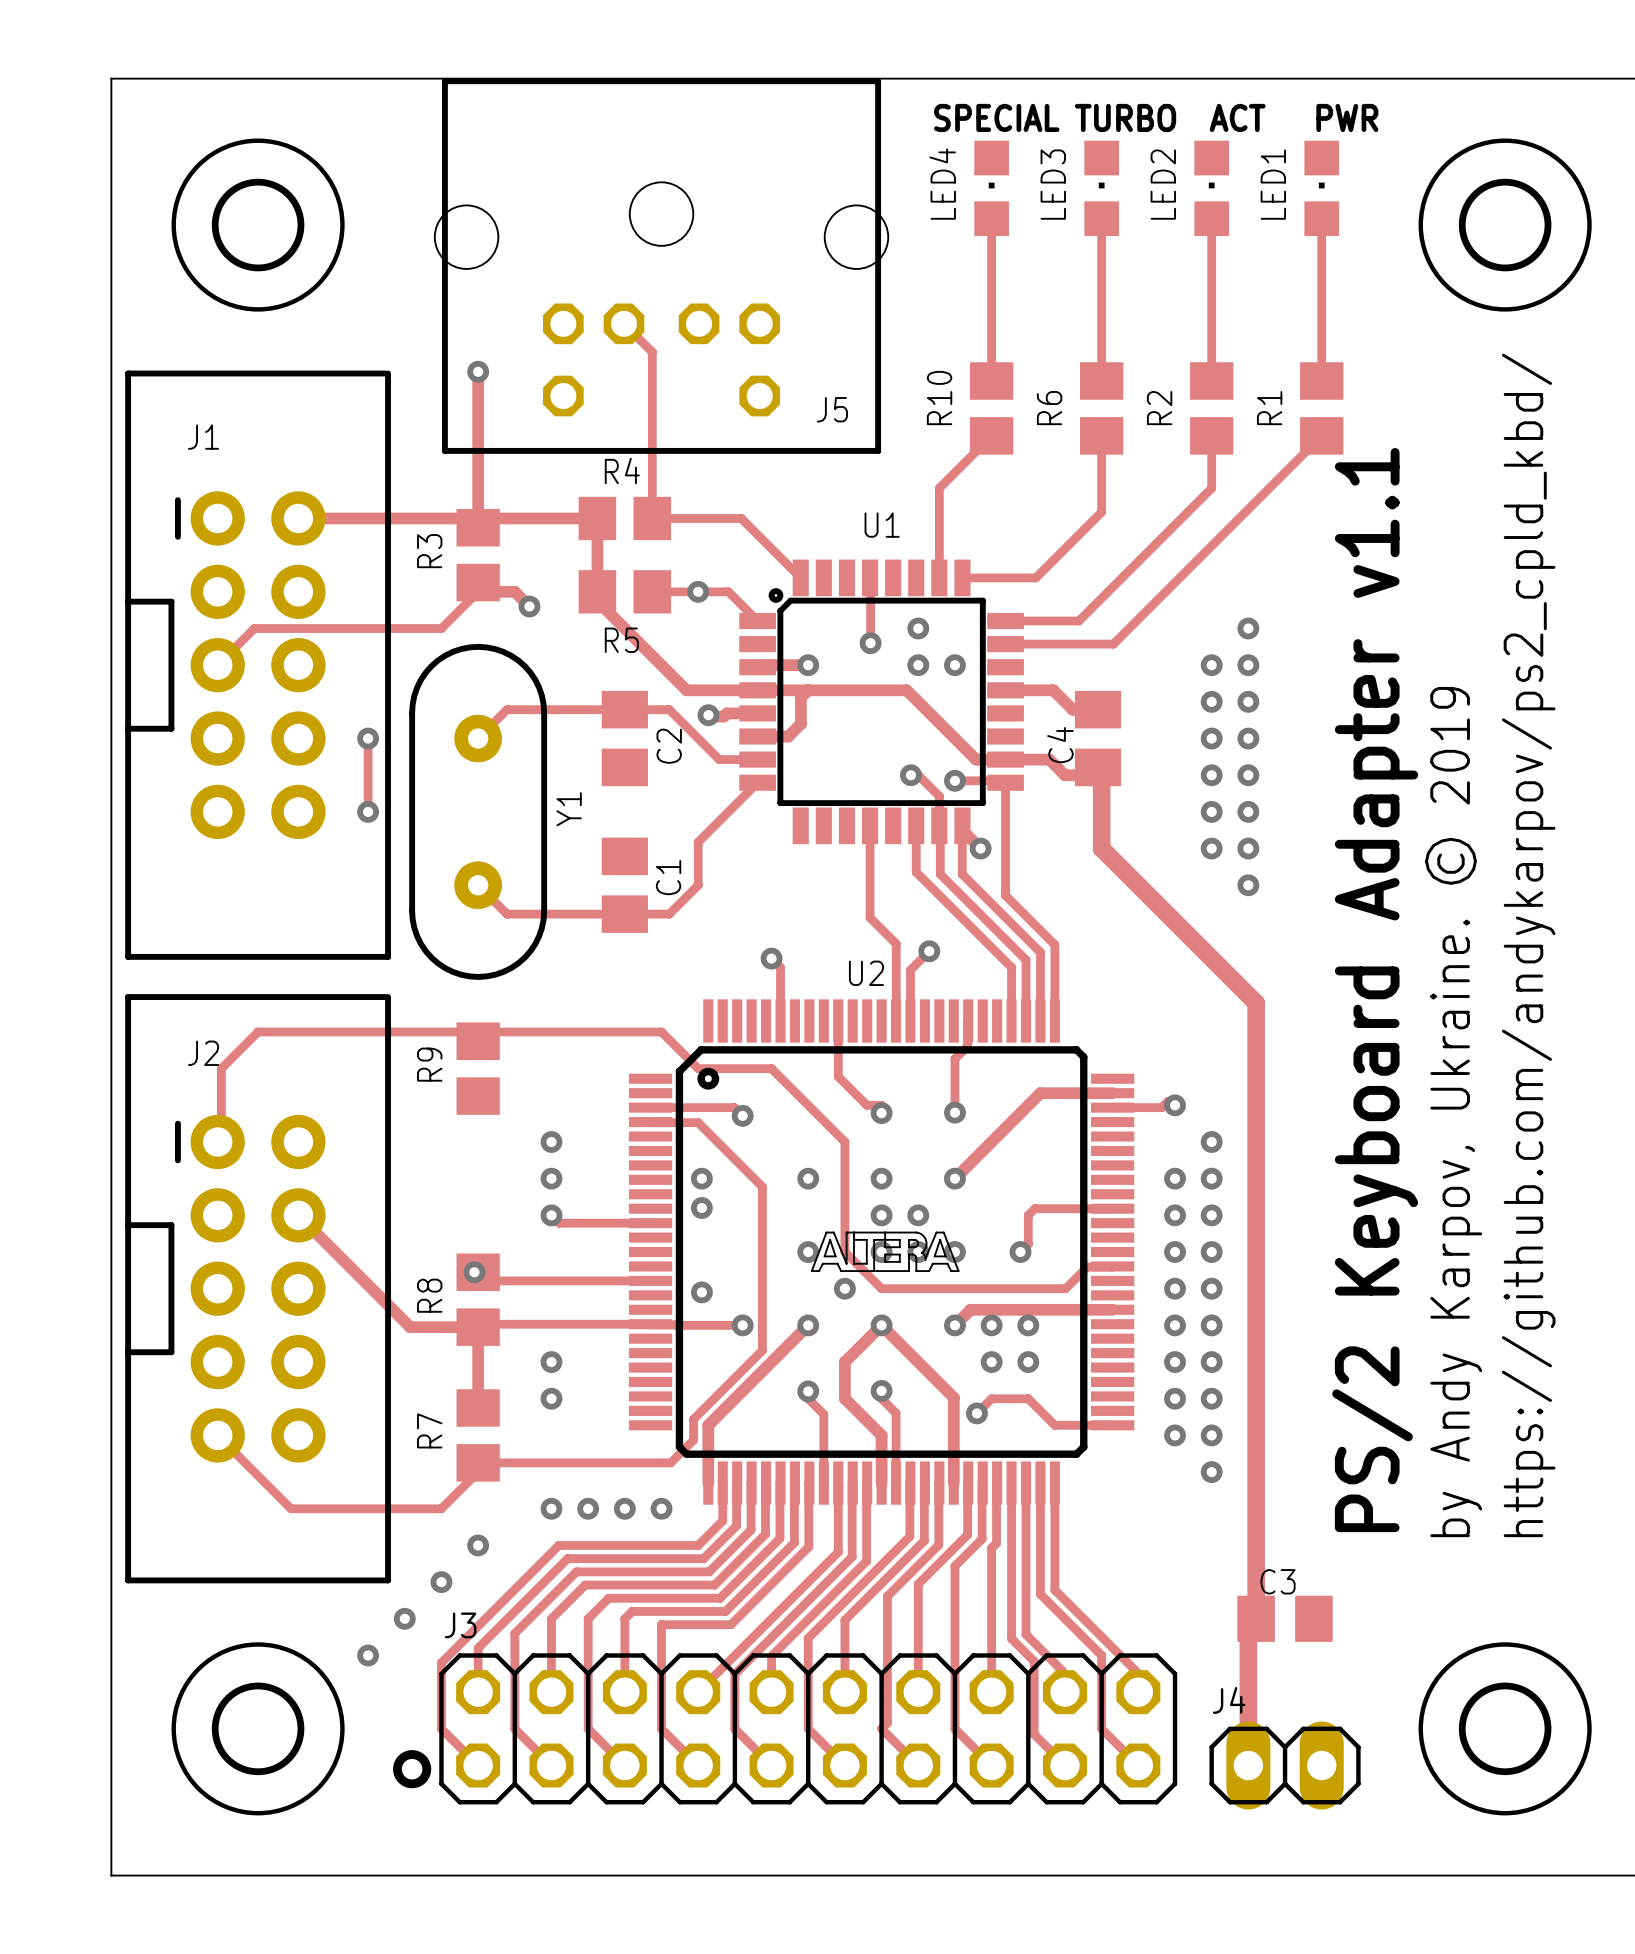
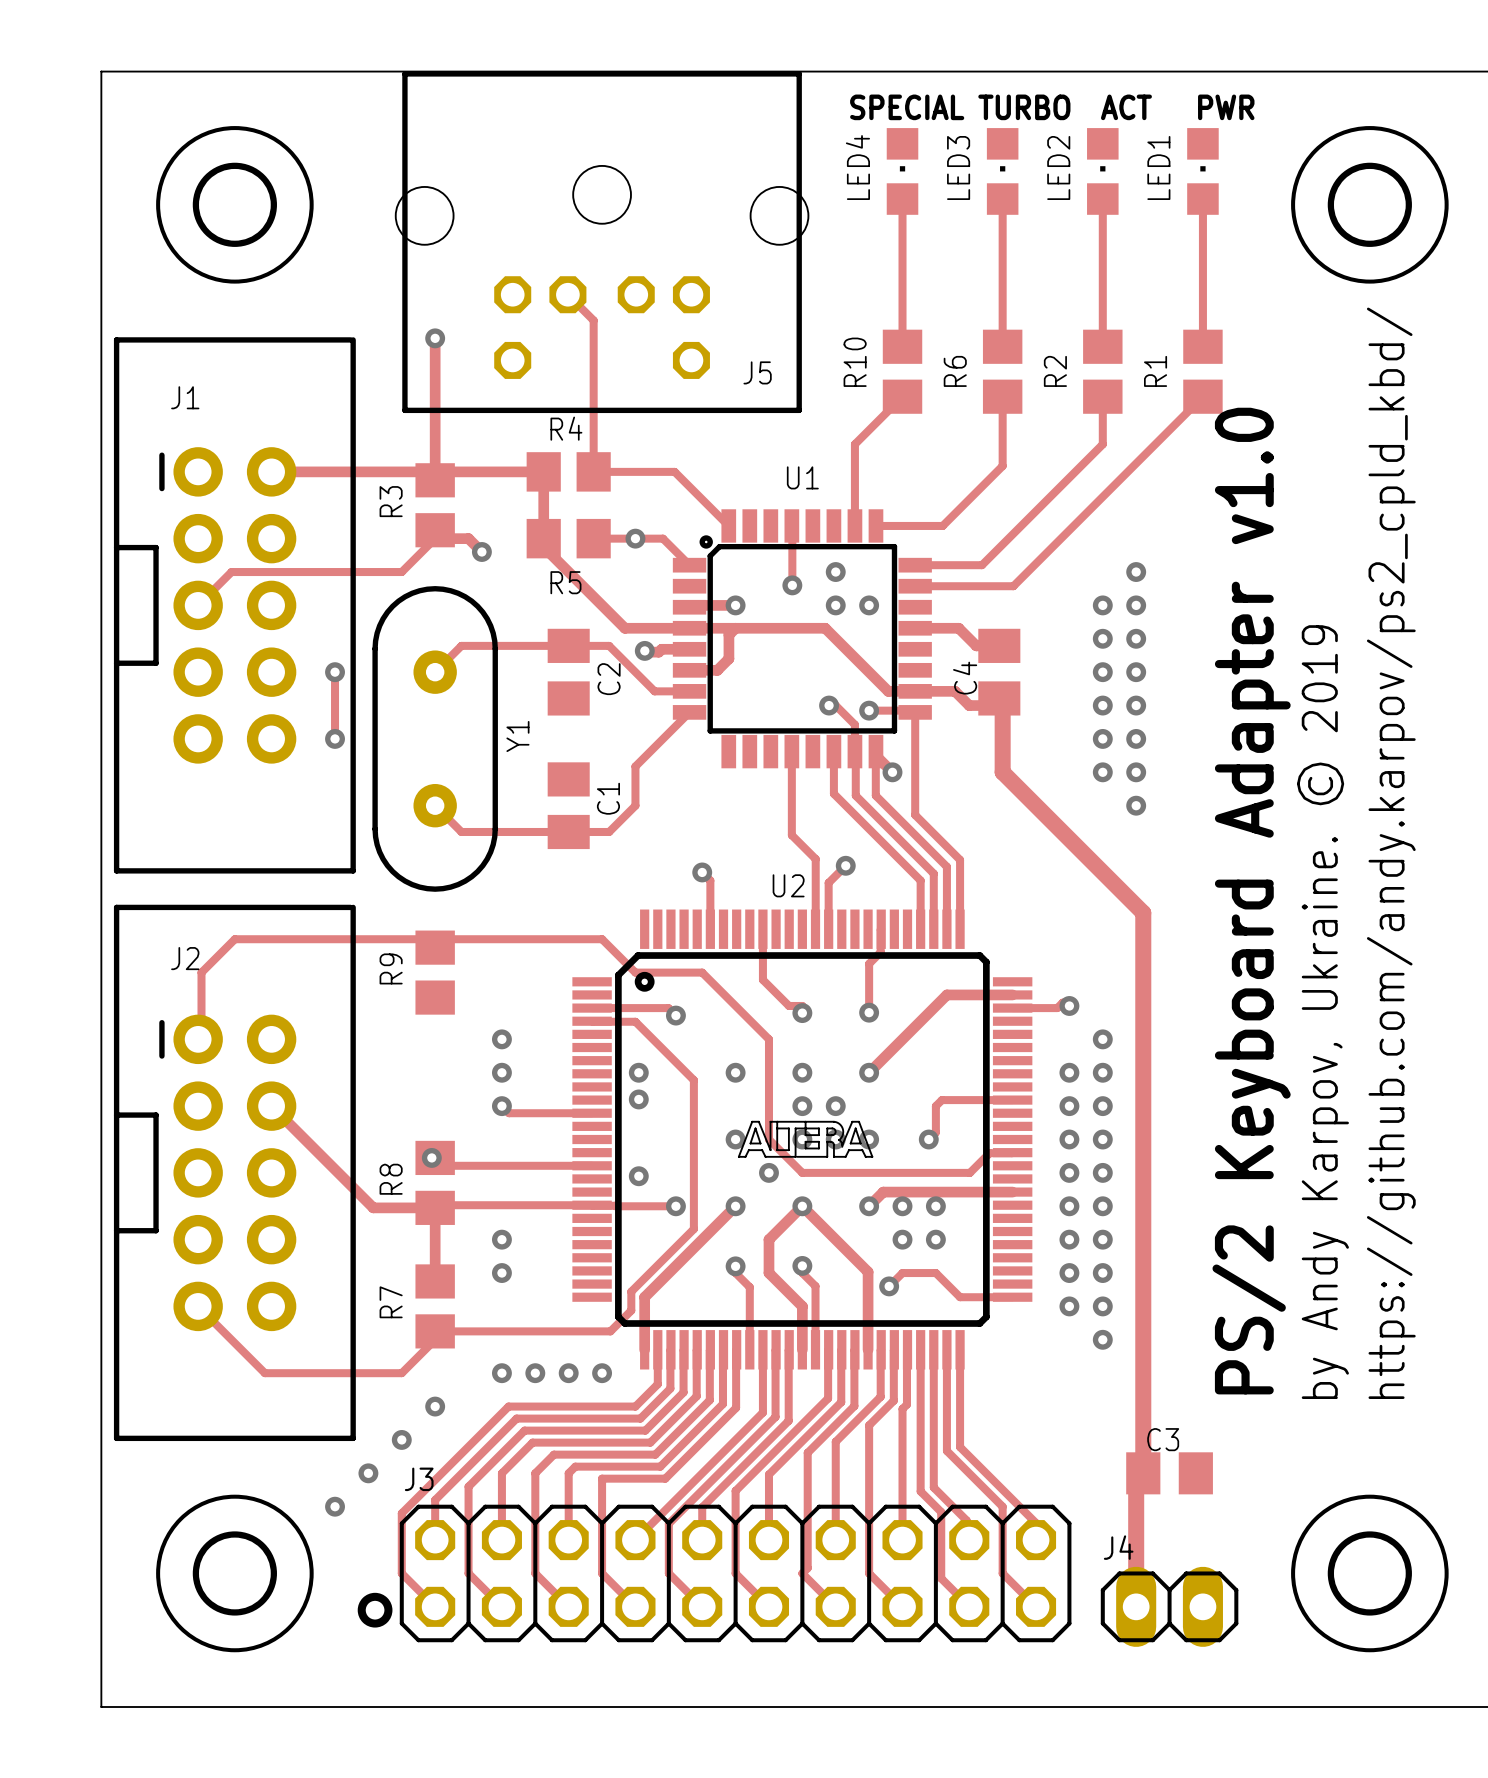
text: https://github.com/andykarpov/ps2_cpld_kbd/ (1528, 945) -> https://github.com/andy.karpov/ps2_cpld_kbd/ (1391, 853)
text: PS/2 Keyboard Adapter v1.1 (1375, 990) -> PS/2 Keyboard Adapter v1.0 (1251, 901)

